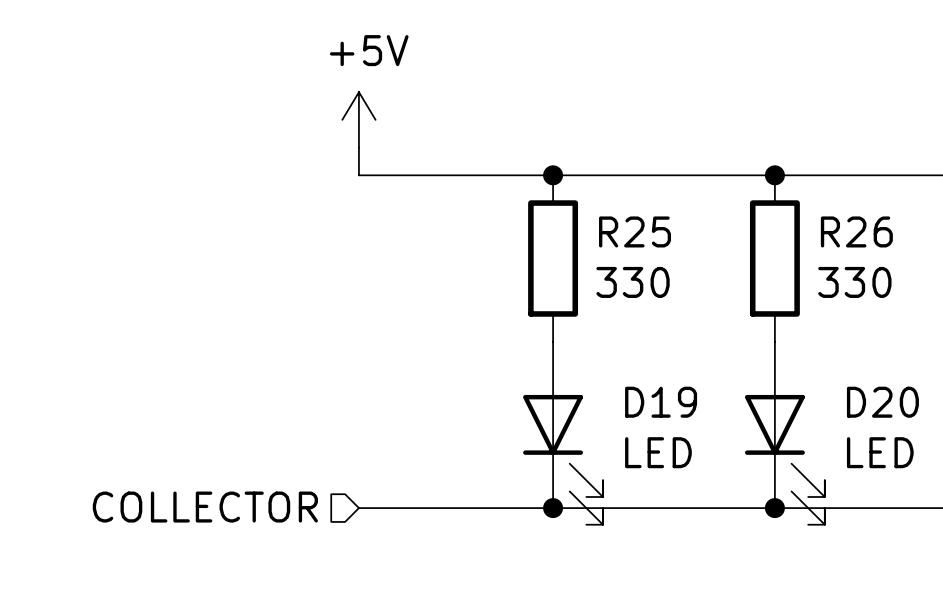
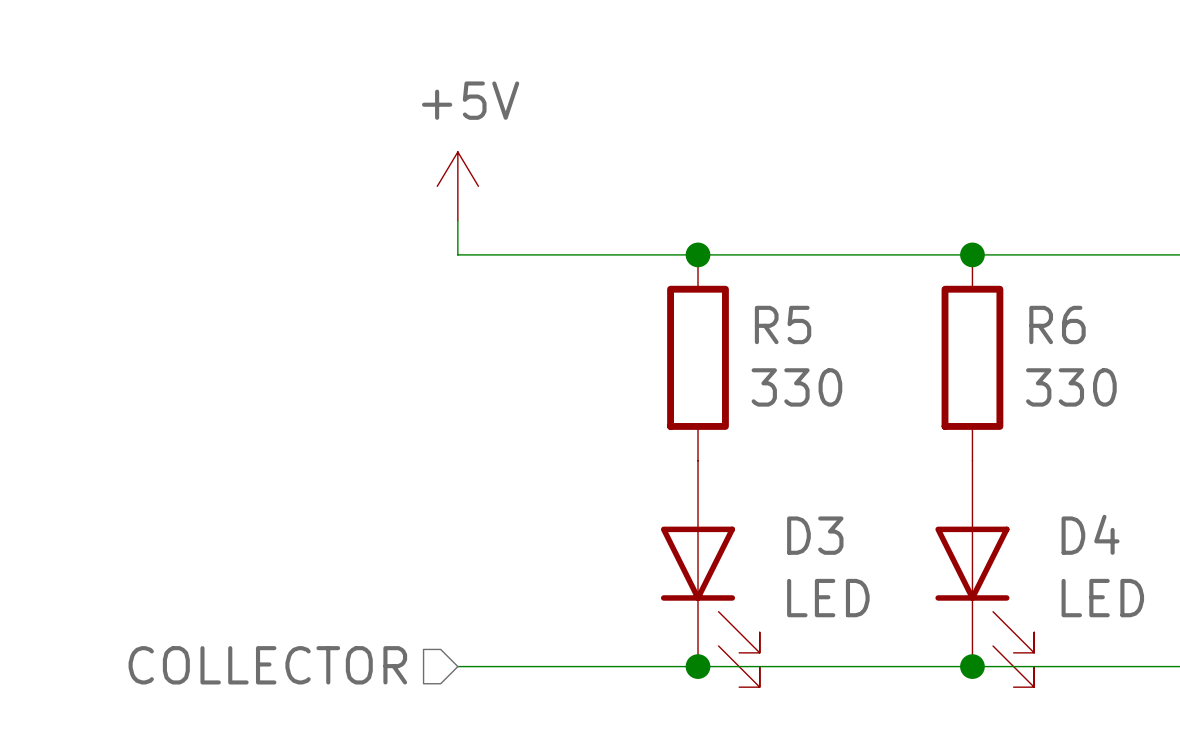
R25 name: R25 (635, 231) -> R5 (783, 324)
R26 name: R26 (856, 231) -> R6 (1057, 324)
D19 name: D19 (661, 402) -> D3 (815, 535)
D20 name: D20 (882, 402) -> D4 (1090, 534)

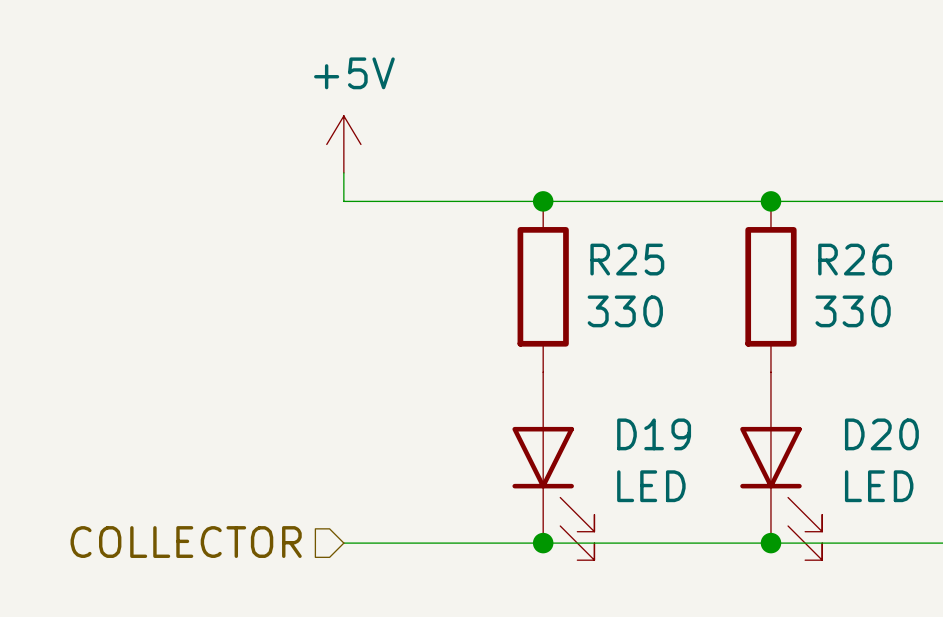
R5 name: R5 (783, 324) -> R25 (627, 259)
R6 name: R6 (1057, 324) -> R26 (855, 259)
D4 name: D4 (1090, 534) -> D20 (881, 434)
D3 name: D3 (815, 535) -> D19 (654, 434)

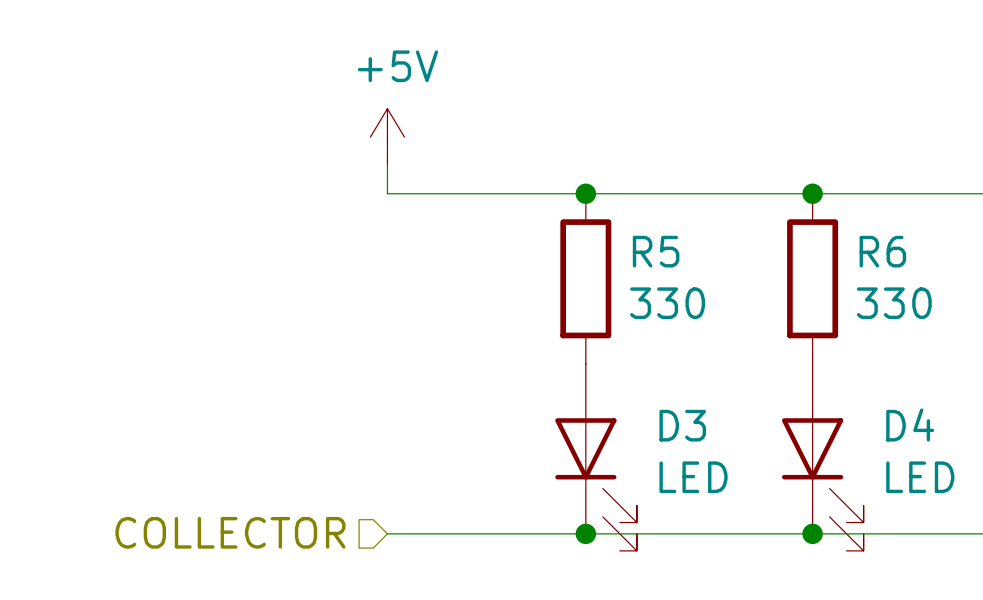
R25 name: R25 (627, 259) -> R5 (656, 251)
R26 name: R26 (855, 259) -> R6 (882, 251)
D19 name: D19 (654, 434) -> D3 (682, 425)
D20 name: D20 (881, 434) -> D4 (910, 425)

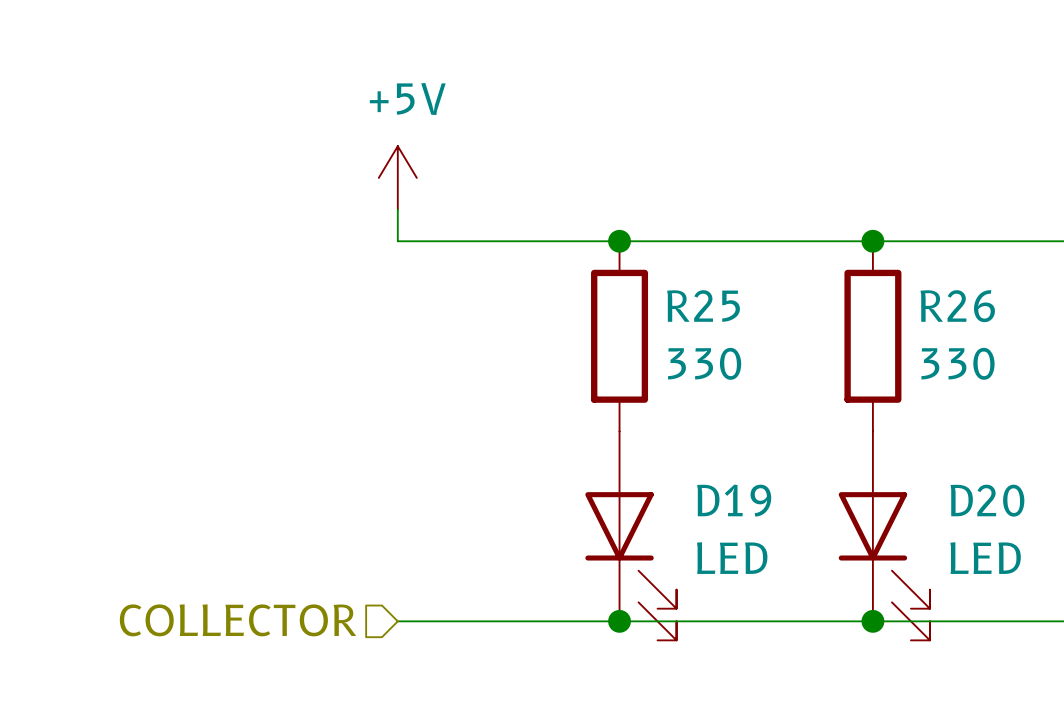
R5 name: R5 (656, 251) -> R25 (703, 305)
R6 name: R6 (882, 251) -> R26 (957, 306)
D3 name: D3 (682, 425) -> D19 (734, 500)
D4 name: D4 (910, 425) -> D20 (987, 500)

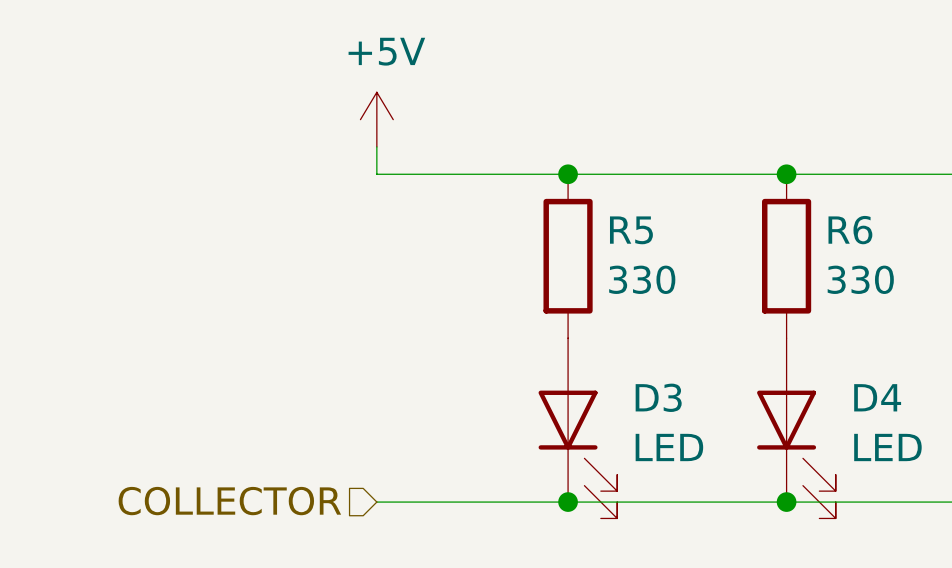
R25 name: R25 (703, 305) -> R5 (631, 230)
R26 name: R26 (957, 306) -> R6 (850, 230)
D19 name: D19 (734, 500) -> D3 (658, 397)
D20 name: D20 (987, 500) -> D4 (877, 397)

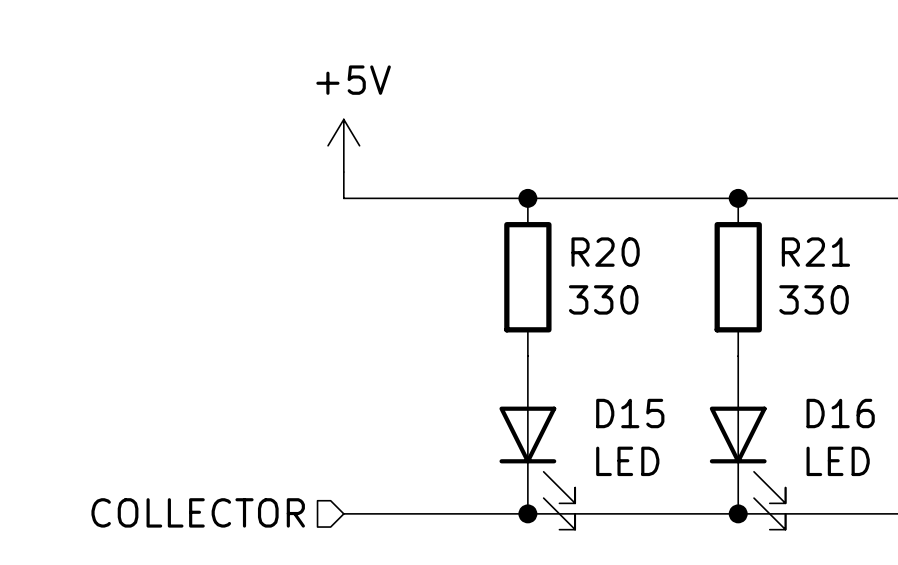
R5 name: R5 (631, 230) -> R20 (605, 252)
R6 name: R6 (850, 230) -> R21 (815, 252)
D3 name: D3 (658, 397) -> D15 (630, 413)
D4 name: D4 (877, 397) -> D16 (840, 413)

